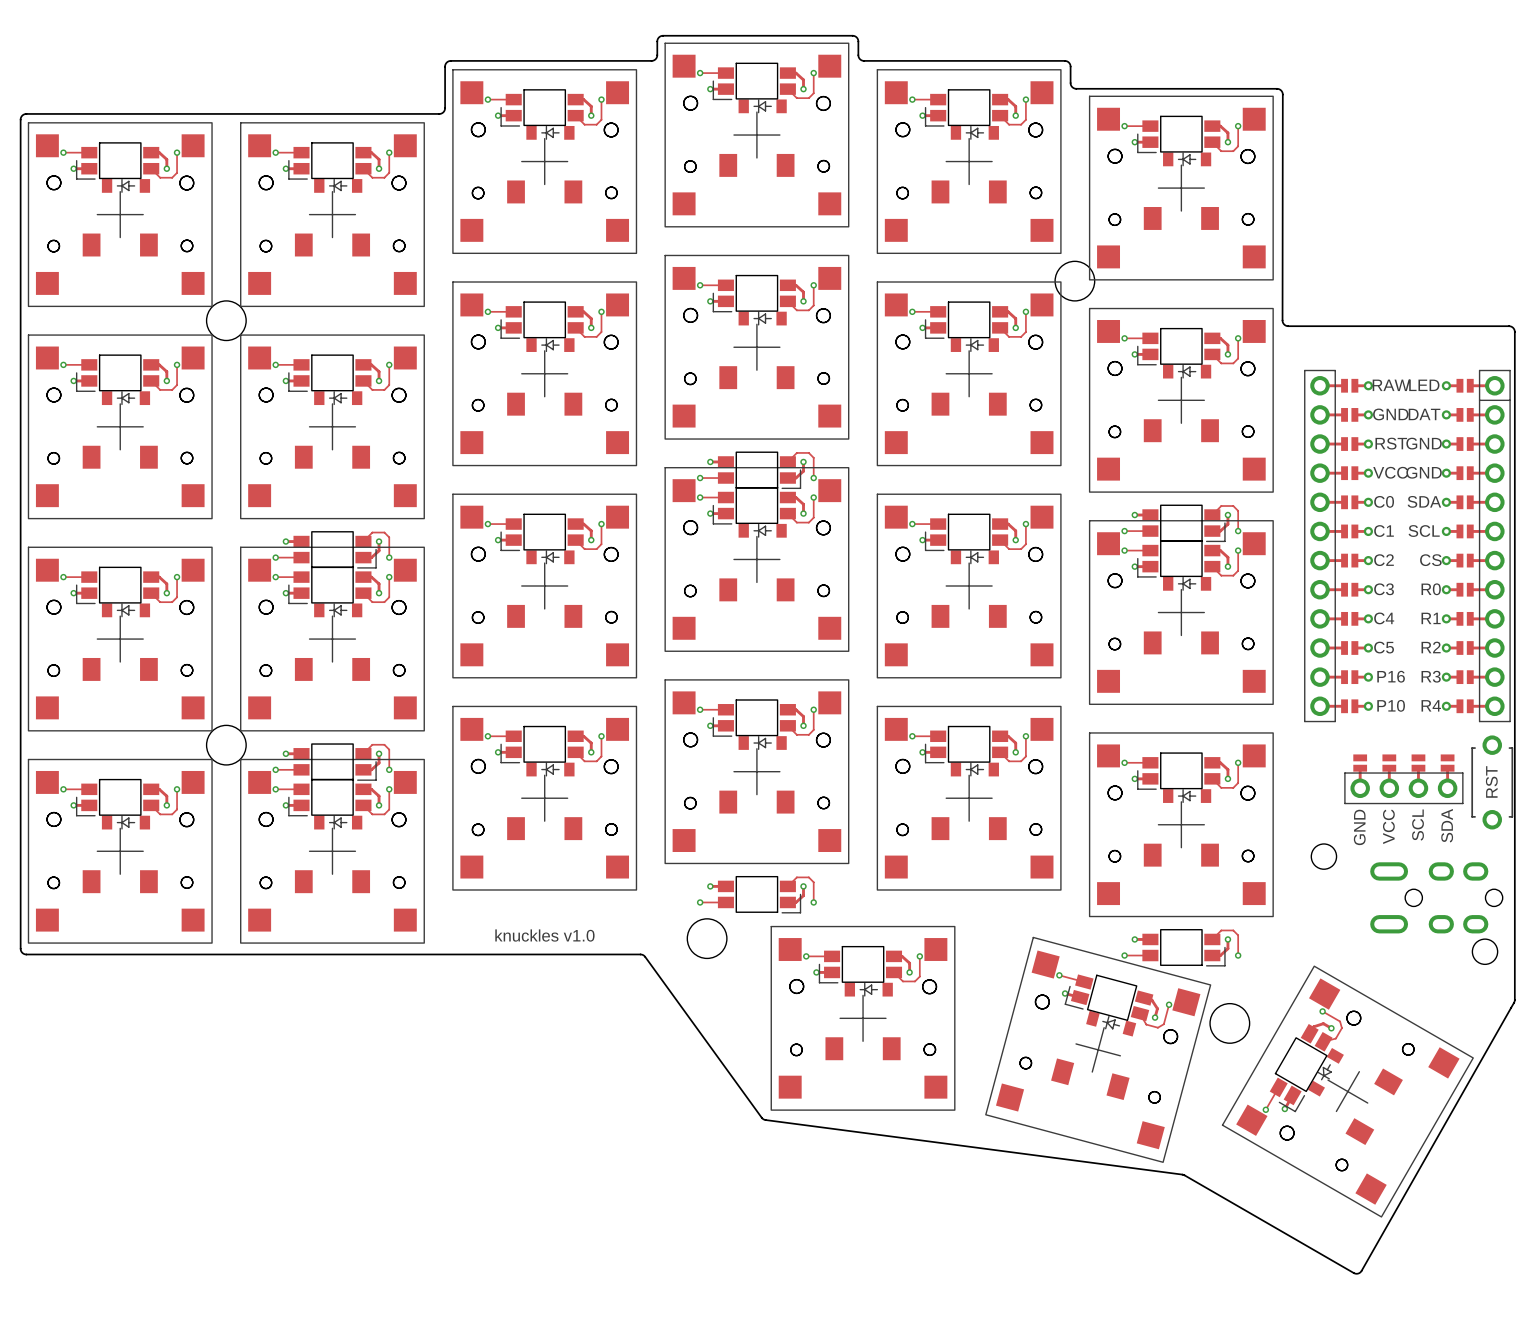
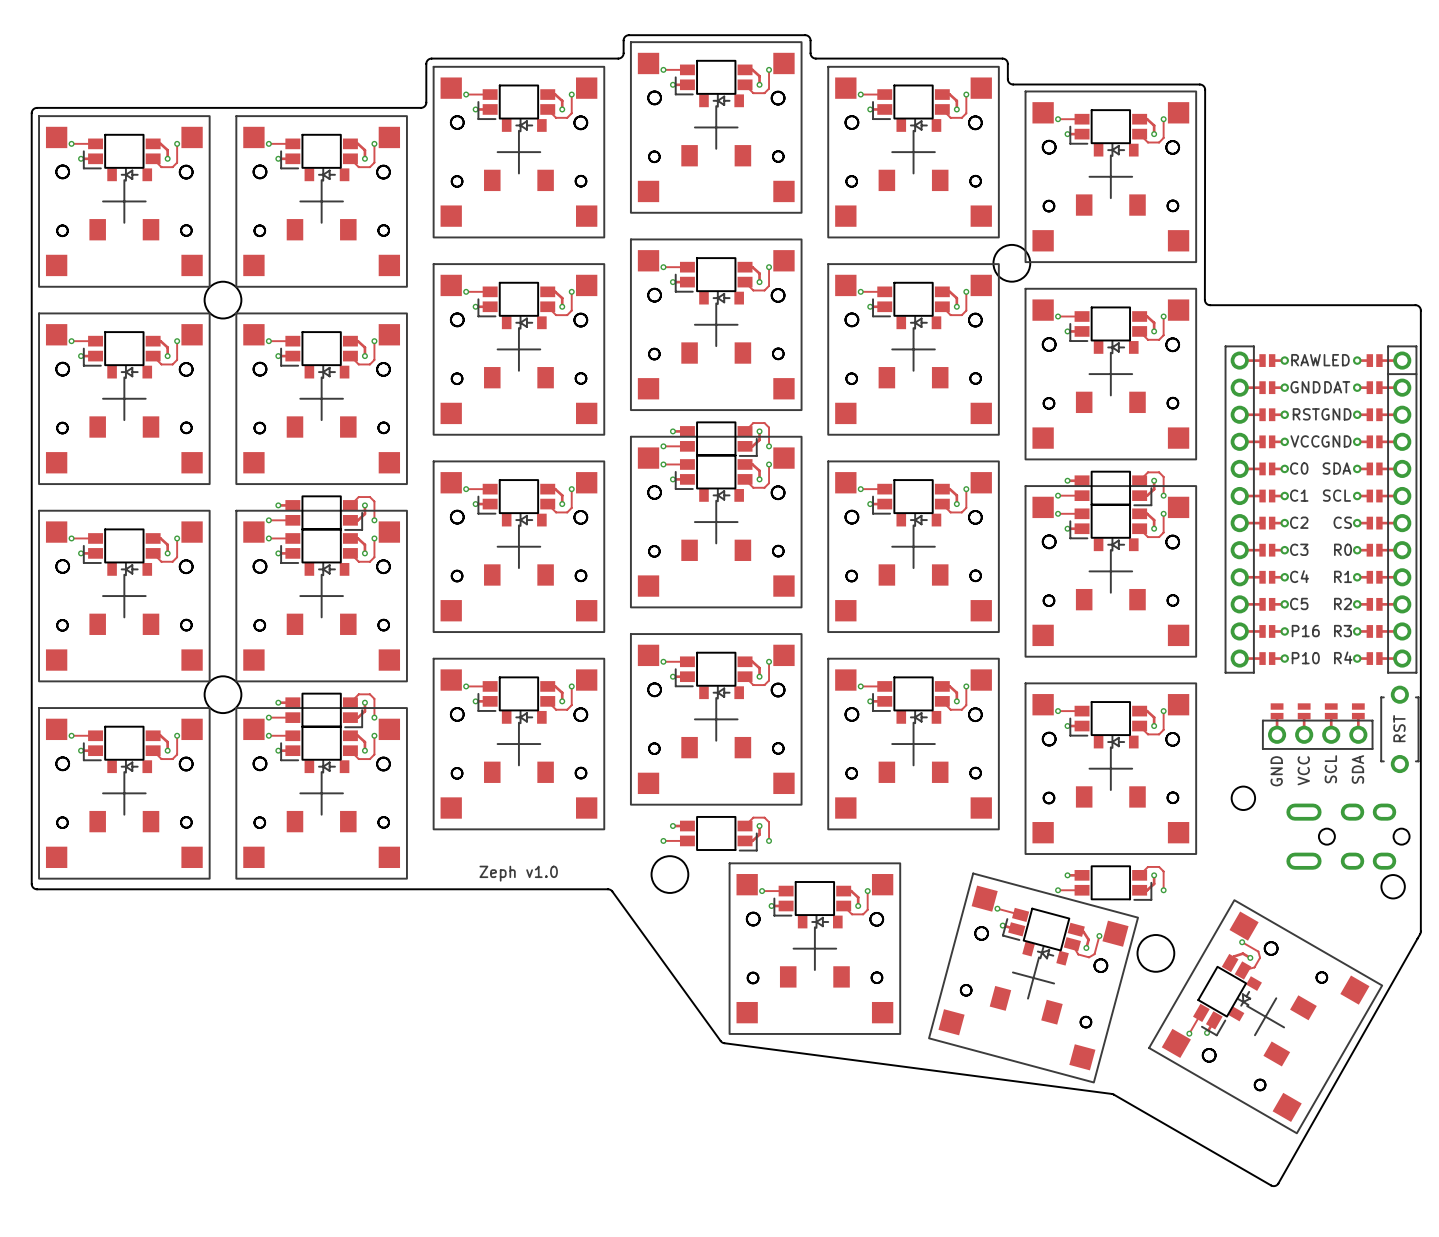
text: knuckles v1.0 (544, 935) -> Zeph v1.0 (518, 873)

